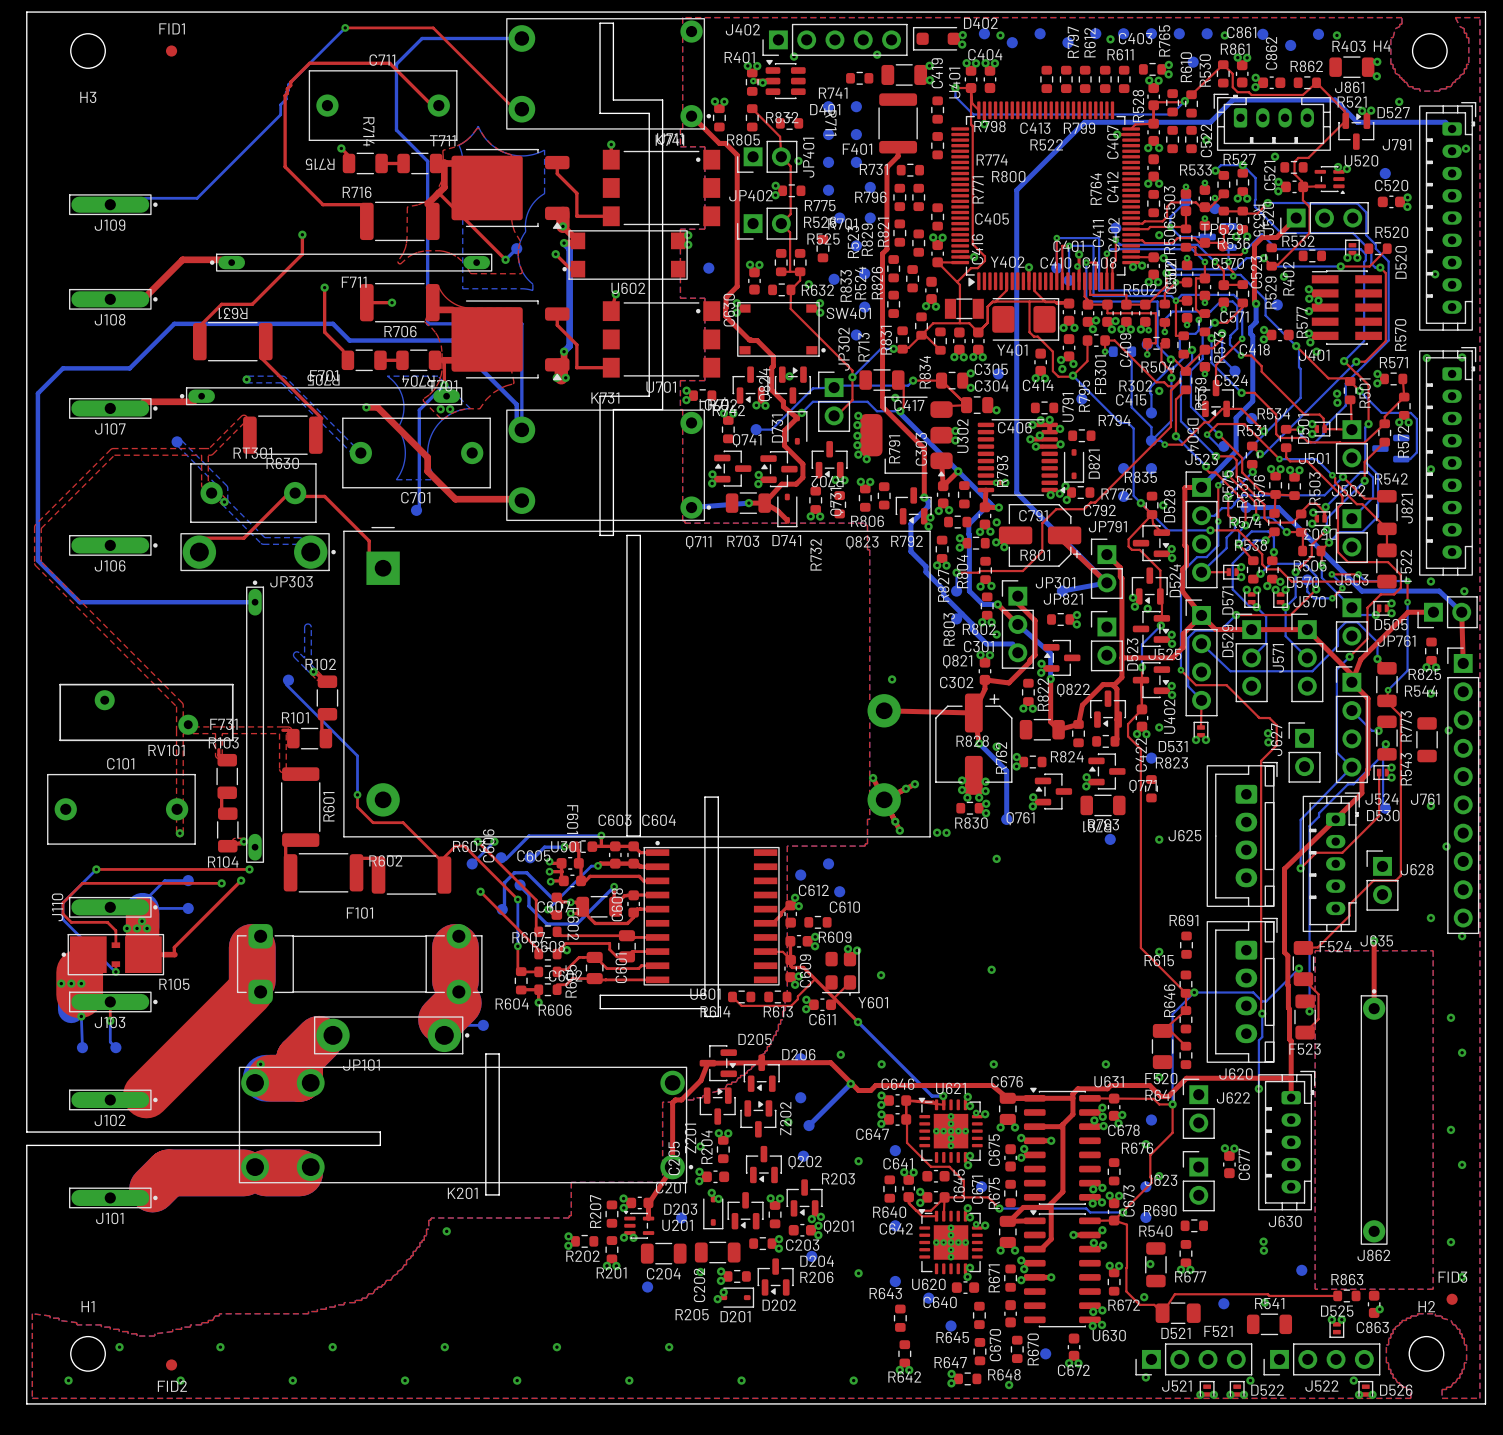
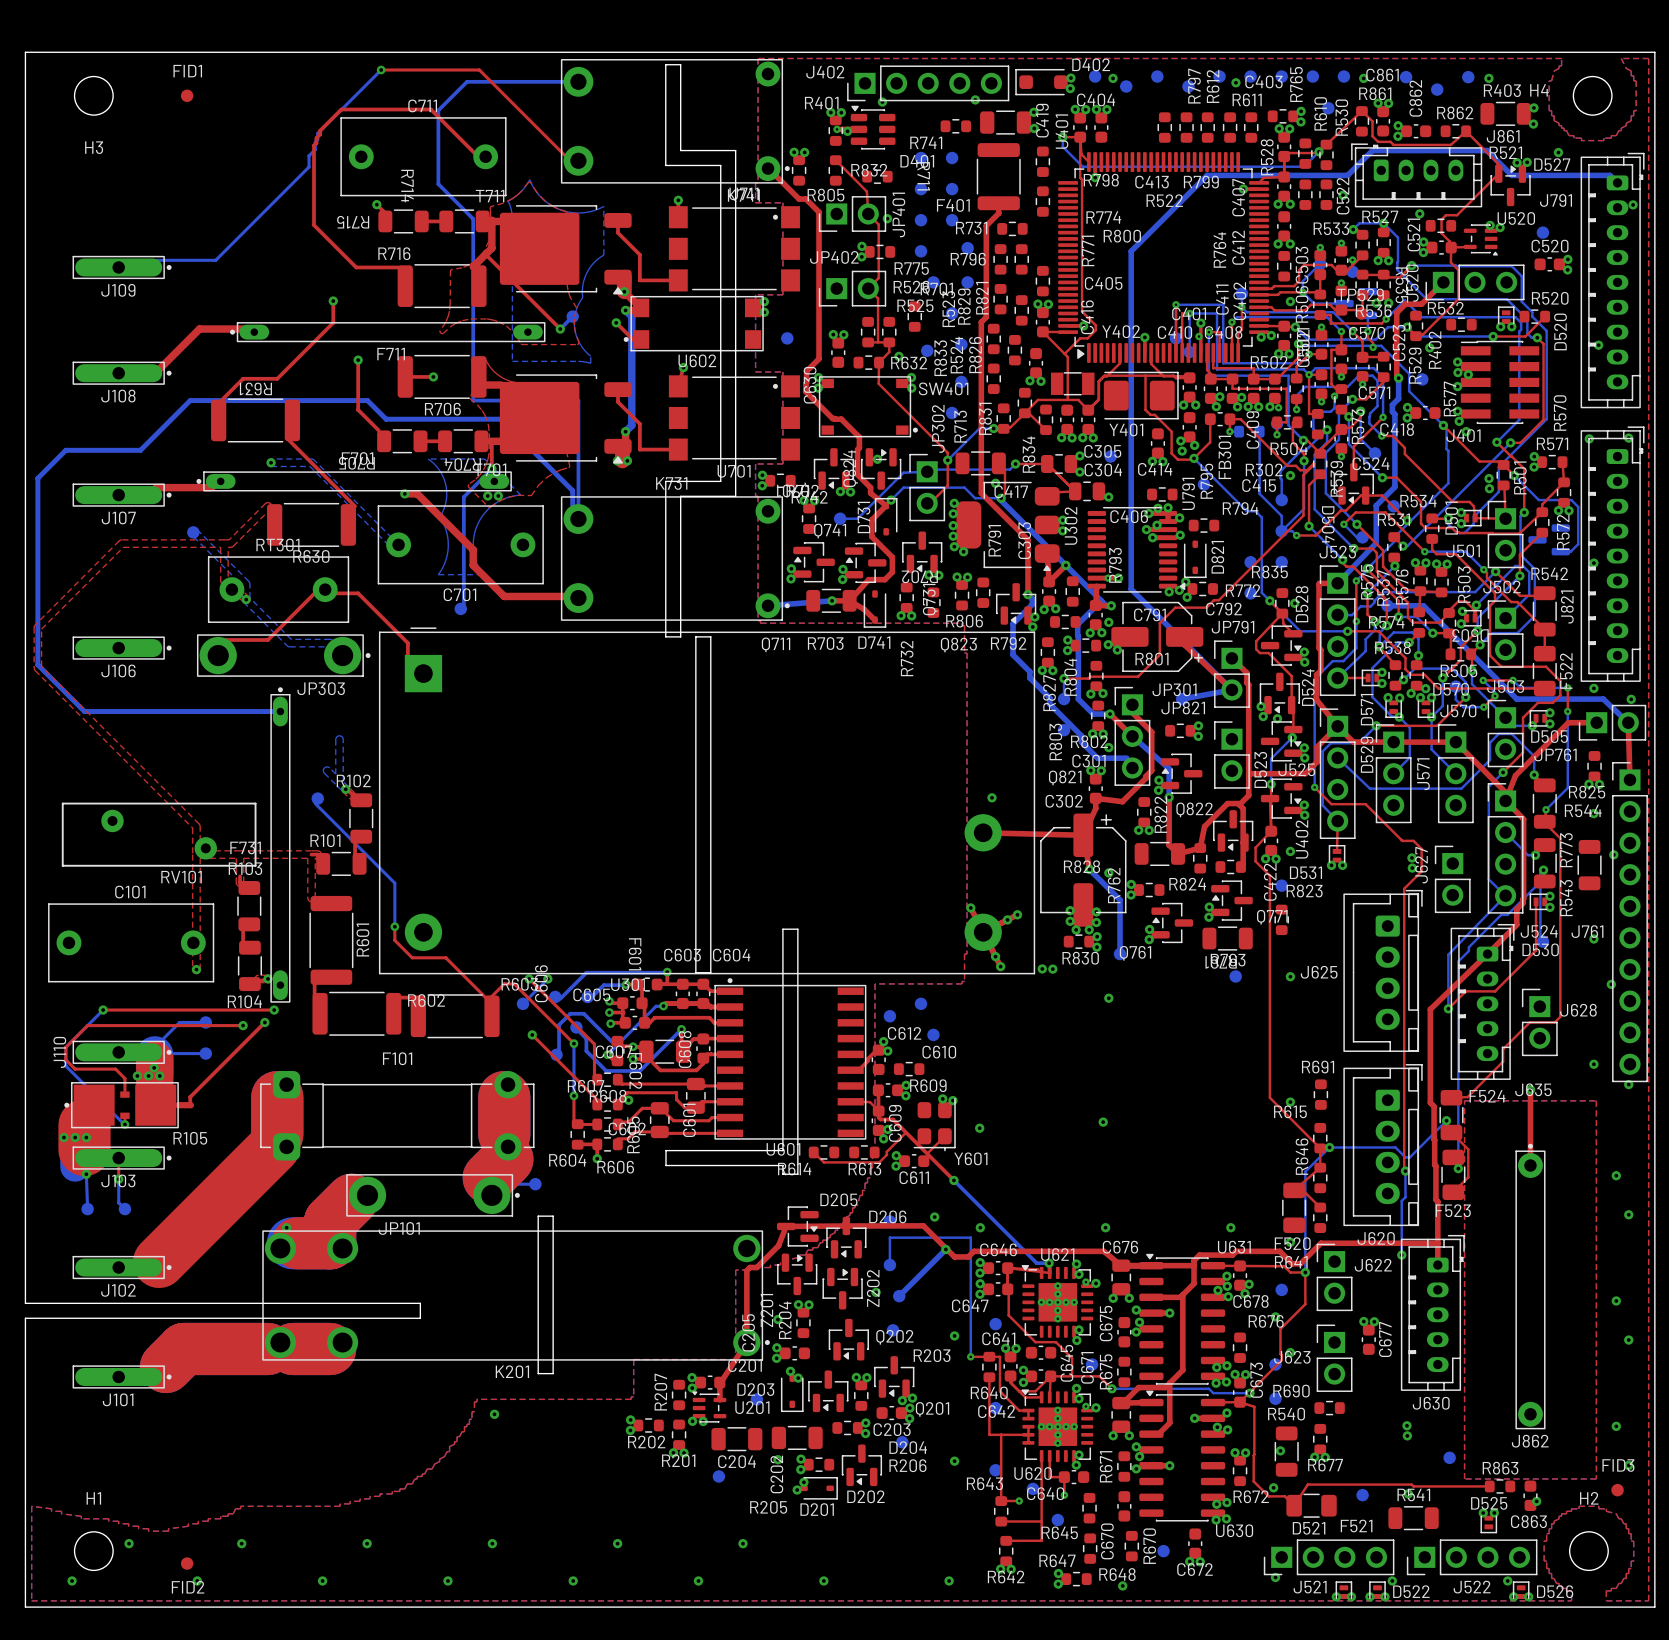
bottom track: none -> (889, 1265) (889, 1237) (970, 1237) (970, 1356)
via: none -> (970, 1356)
top track: none -> (974, 1356) (999, 1356) (999, 1391) (1019, 1410) (1028, 1410) (1028, 1418)
top track: none -> (989, 1377) (989, 1434) (1028, 1434)
top track: none -> (1028, 1426) (1028, 1442)
top track: none -> (1001, 1434) (1001, 1500) (1019, 1500)
top track: none -> (1041, 1456) (1041, 1540) (1006, 1540)
top track: none -> (1049, 1456) (1049, 1477) (1064, 1477) (1064, 1495)
via: none -> (1064, 1495)
via: none -> (1019, 1500)
top track: none -> (1001, 1521) (1041, 1521)

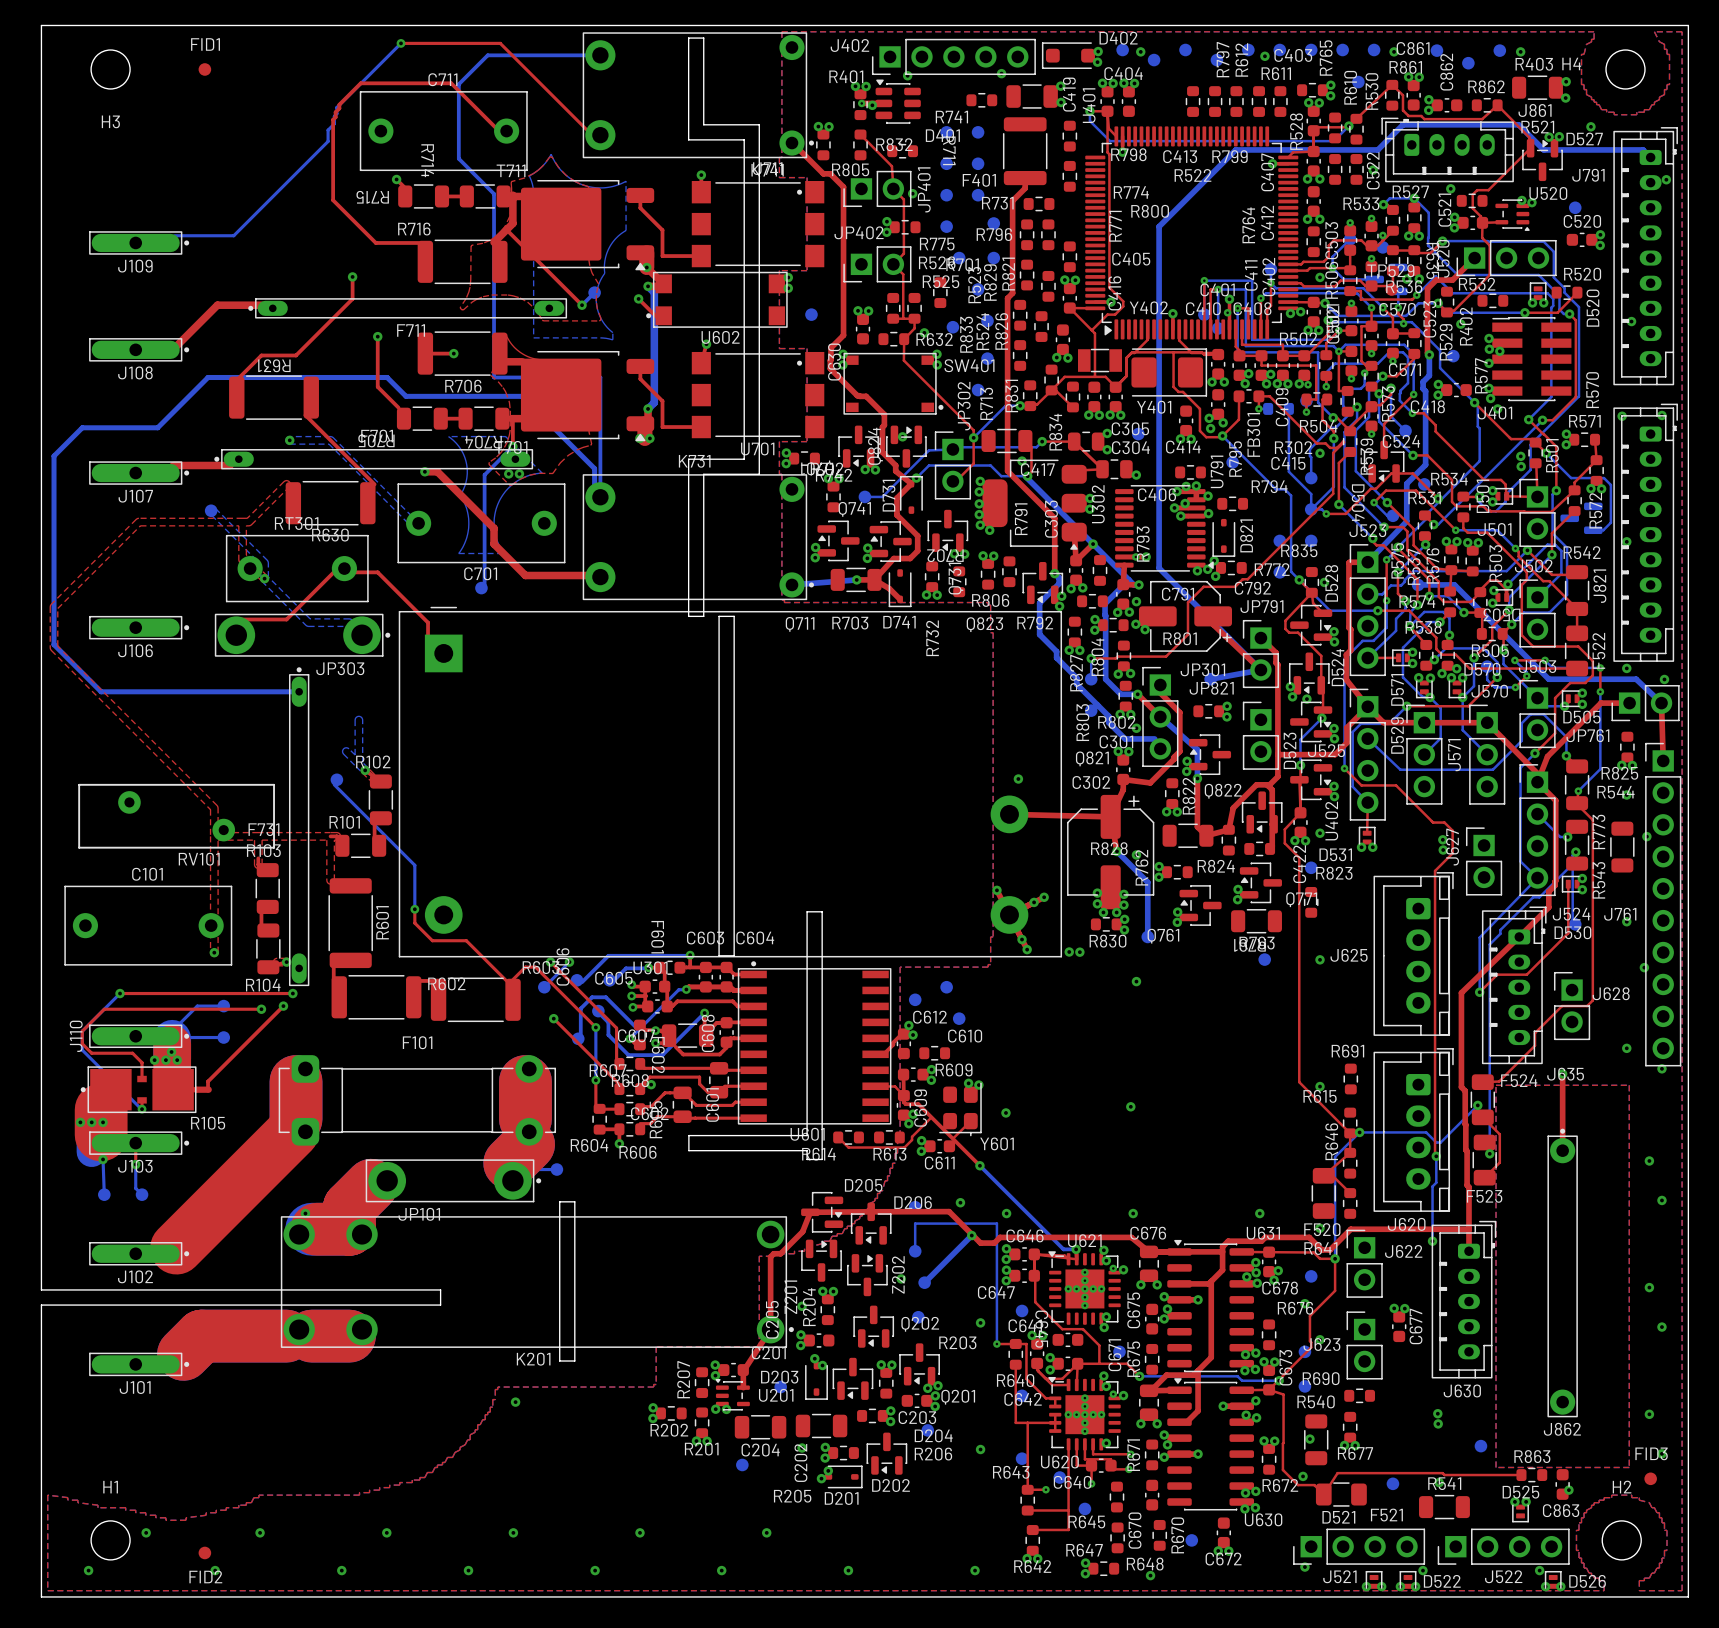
C645 name rotation: 0° (1066, 1363) -> 180° (1041, 1329)
C645 name position: C645 (1066, 1363) -> C645 (1041, 1329)
top track: none -> (1084, 1444) (1084, 1459) (1111, 1459) (1111, 1469) (1128, 1469)
top track: none -> (1093, 1444) (1093, 1454) (1130, 1454)
via: (1076, 1465) -> none
via: none -> (1130, 1454)
via: none -> (1128, 1469)

